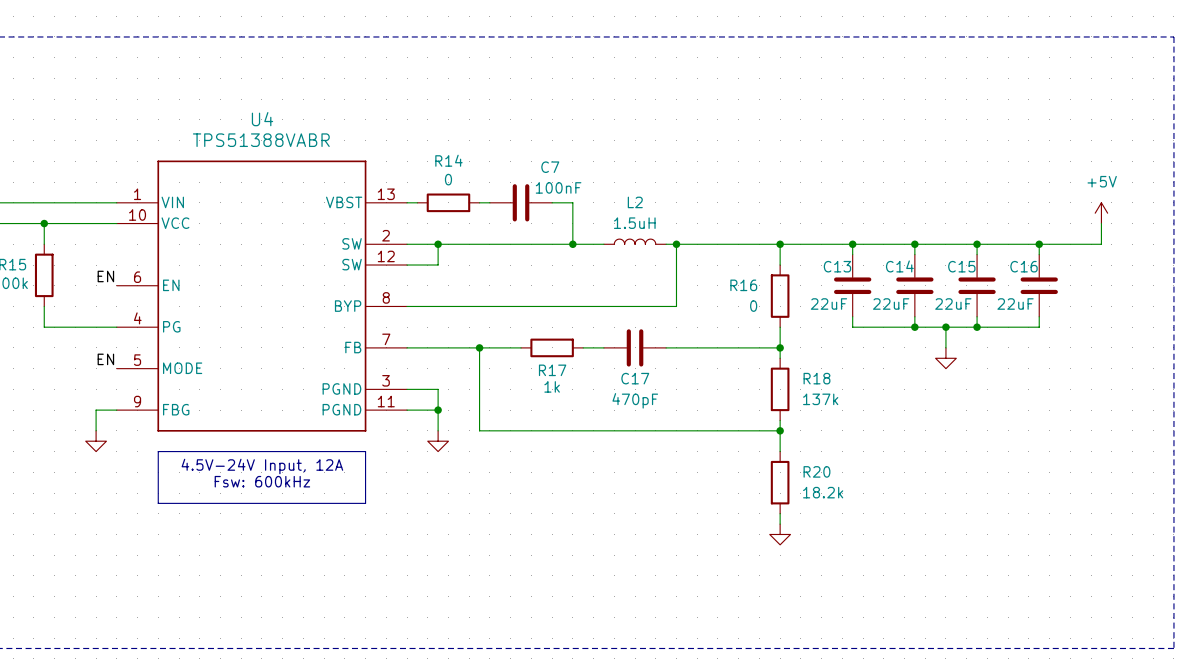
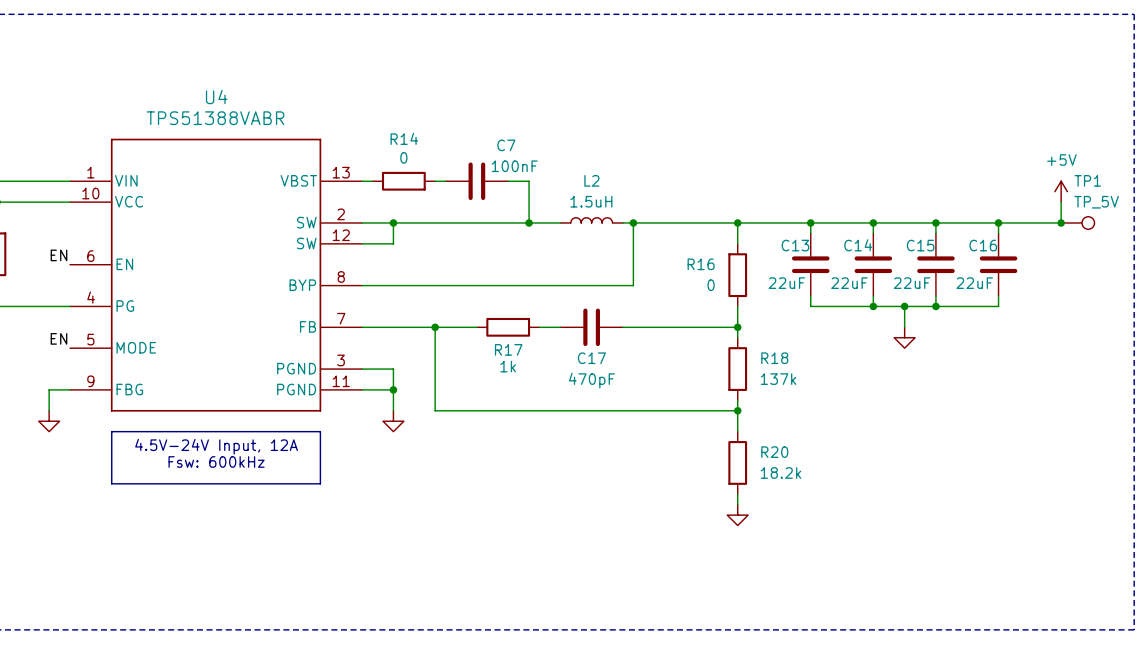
junction: none -> (1061, 222)
TP1: none -> TP_5V (1077, 222)

